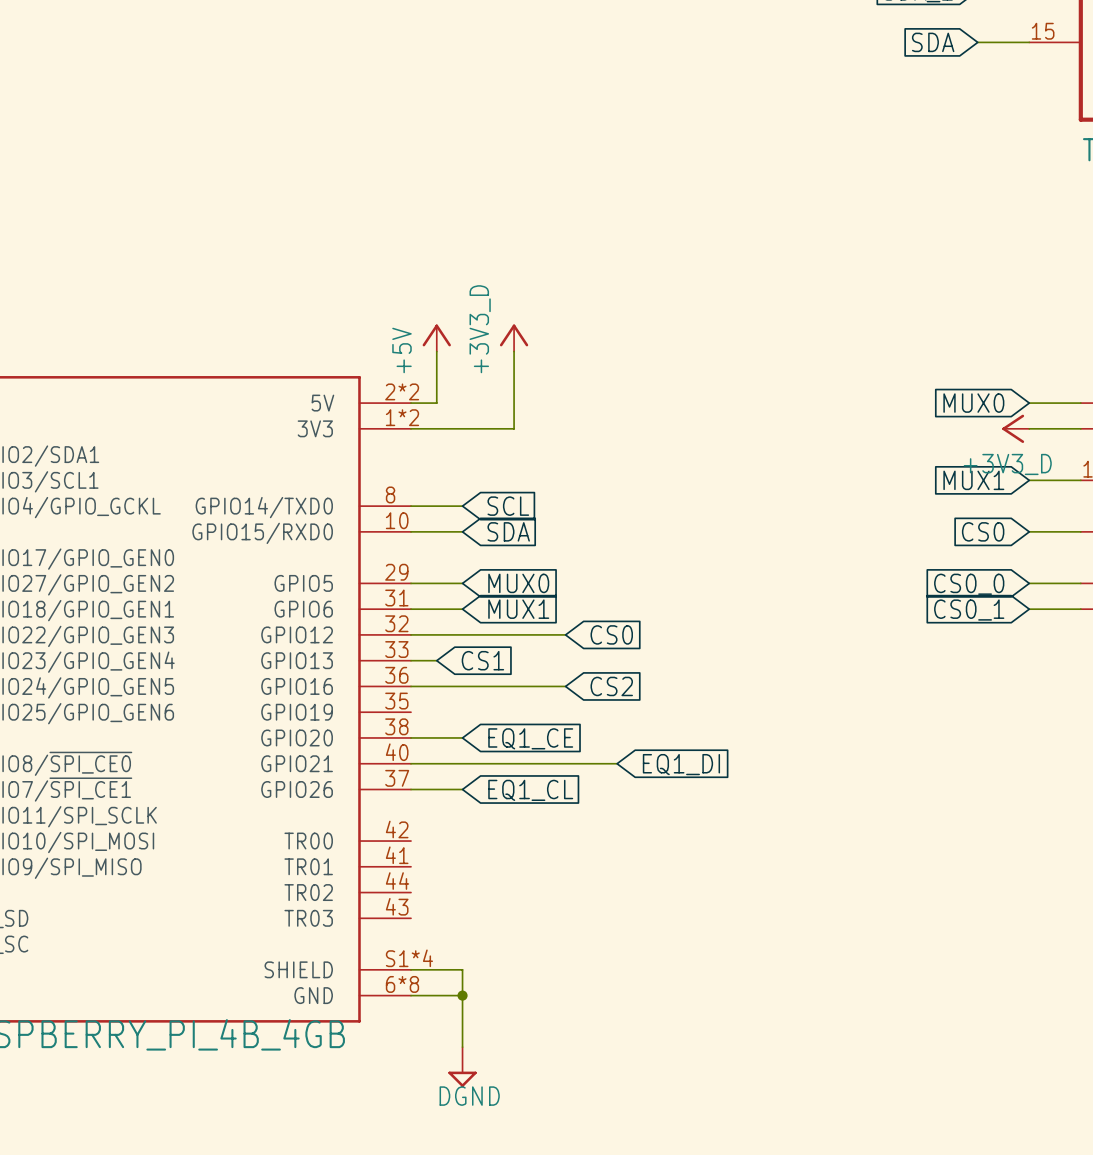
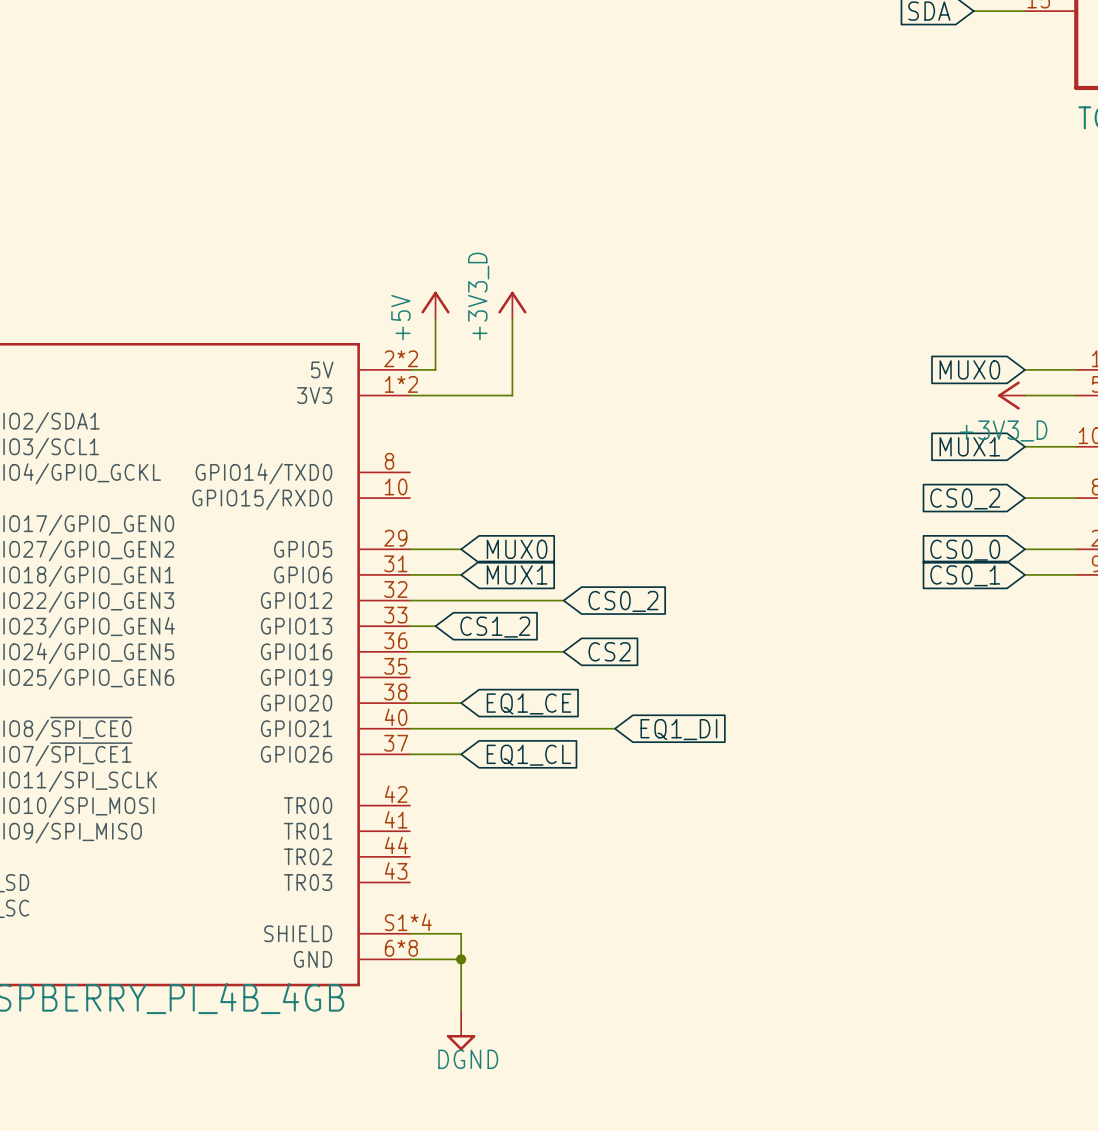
wire: (411, 506) (462, 506) -> none
global label: SCL (508, 506) -> none
wire: (411, 531) (462, 531) -> none
global label: SDA (508, 531) -> none
global label: CS0 (983, 531) -> CS0_2 (965, 498)
global label: CS0 (611, 634) -> CS0_2 (623, 601)
global label: CS1 (482, 660) -> CS1_2 (495, 627)

